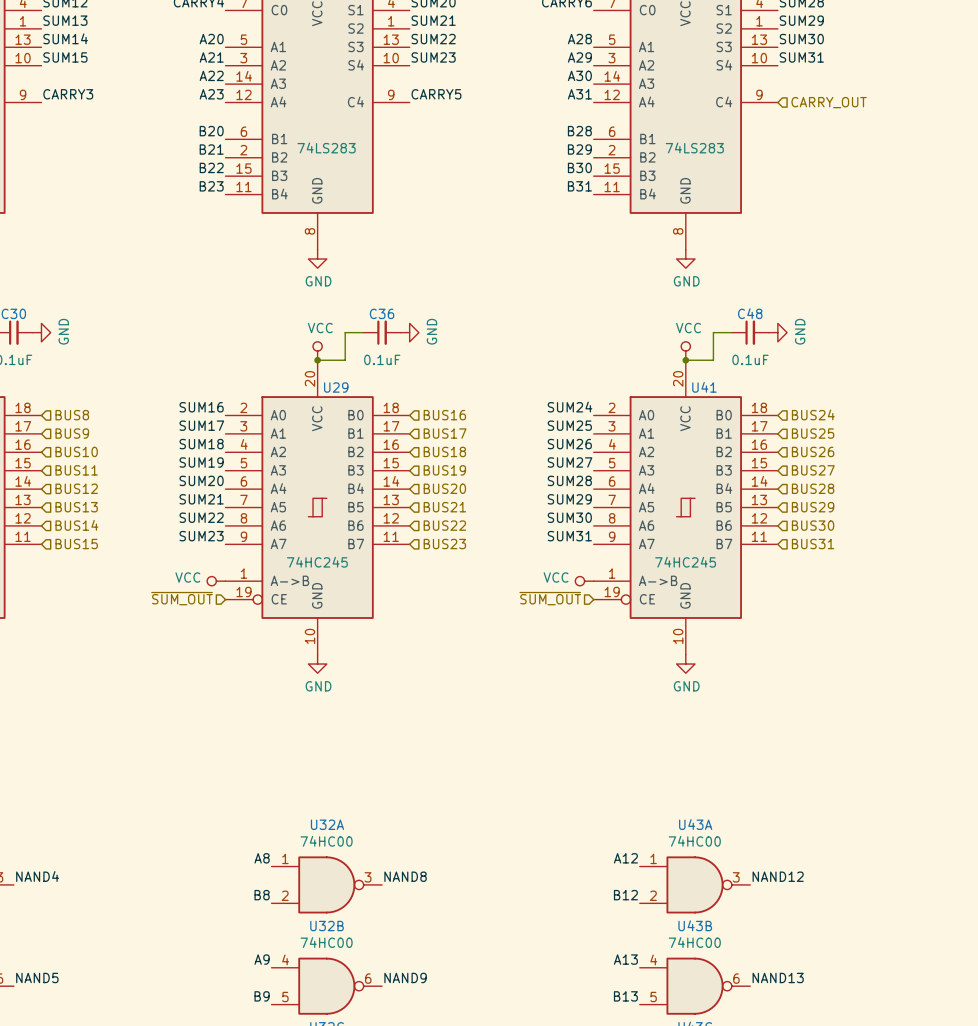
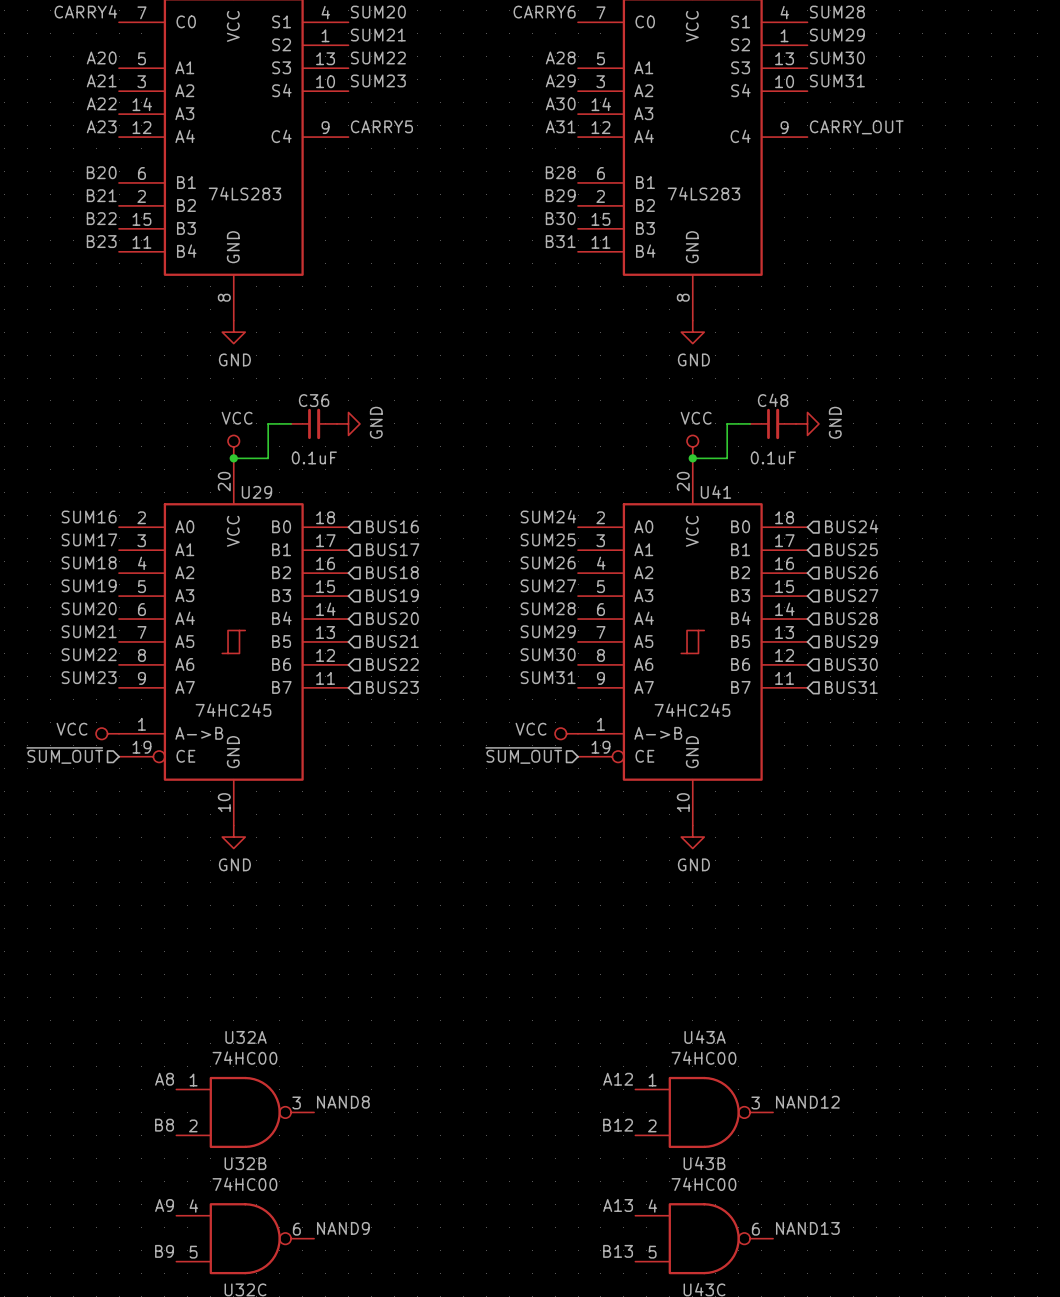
label: none -> CARRY_OUT (856, 127)
hierarchical label: CARRY_OUT (829, 102) -> none

